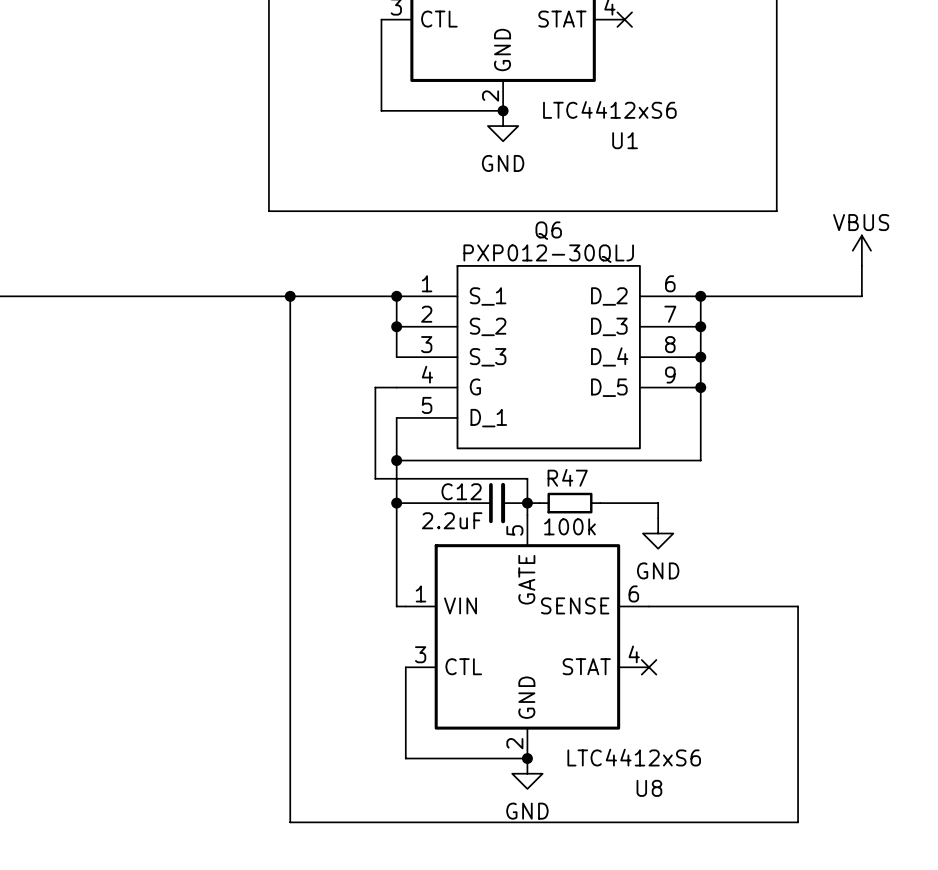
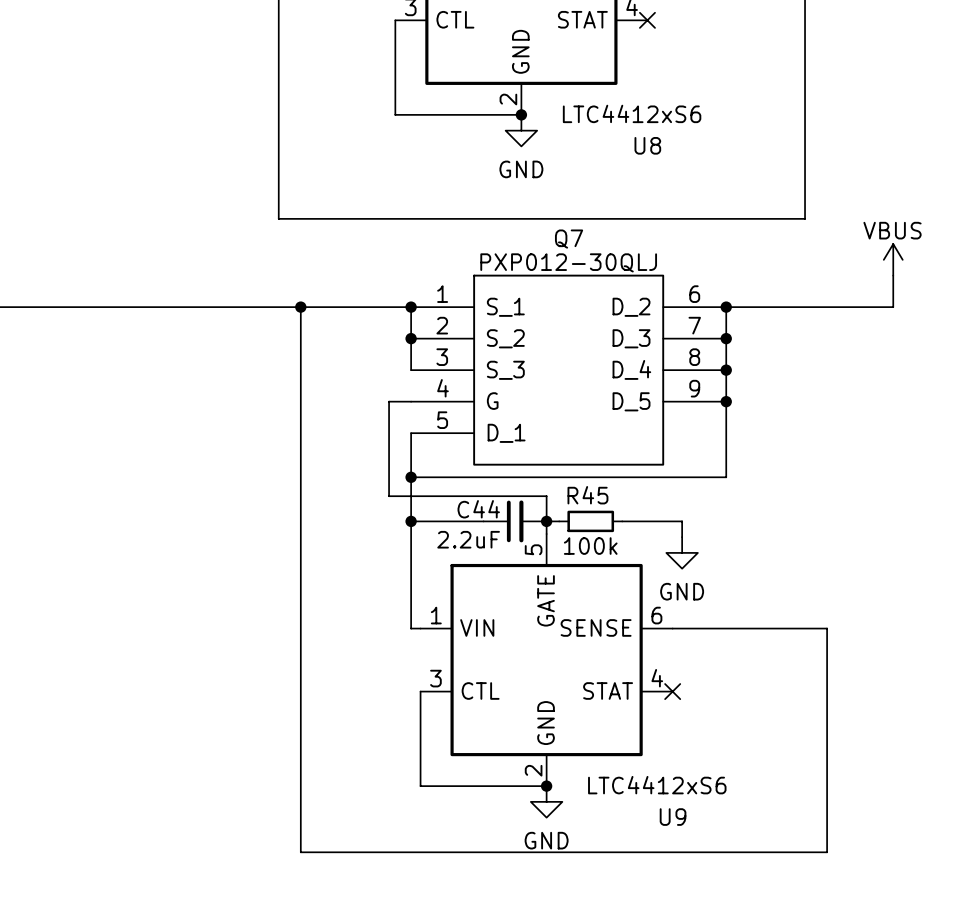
U1 name: U1 (625, 140) -> U8 (647, 145)
Q6 name: Q6 (548, 230) -> Q7 (569, 239)
R47 name: R47 (567, 477) -> R45 (587, 495)
C12 name: C12 (461, 491) -> C44 (478, 509)
U8 name: U8 (649, 788) -> U9 (673, 817)

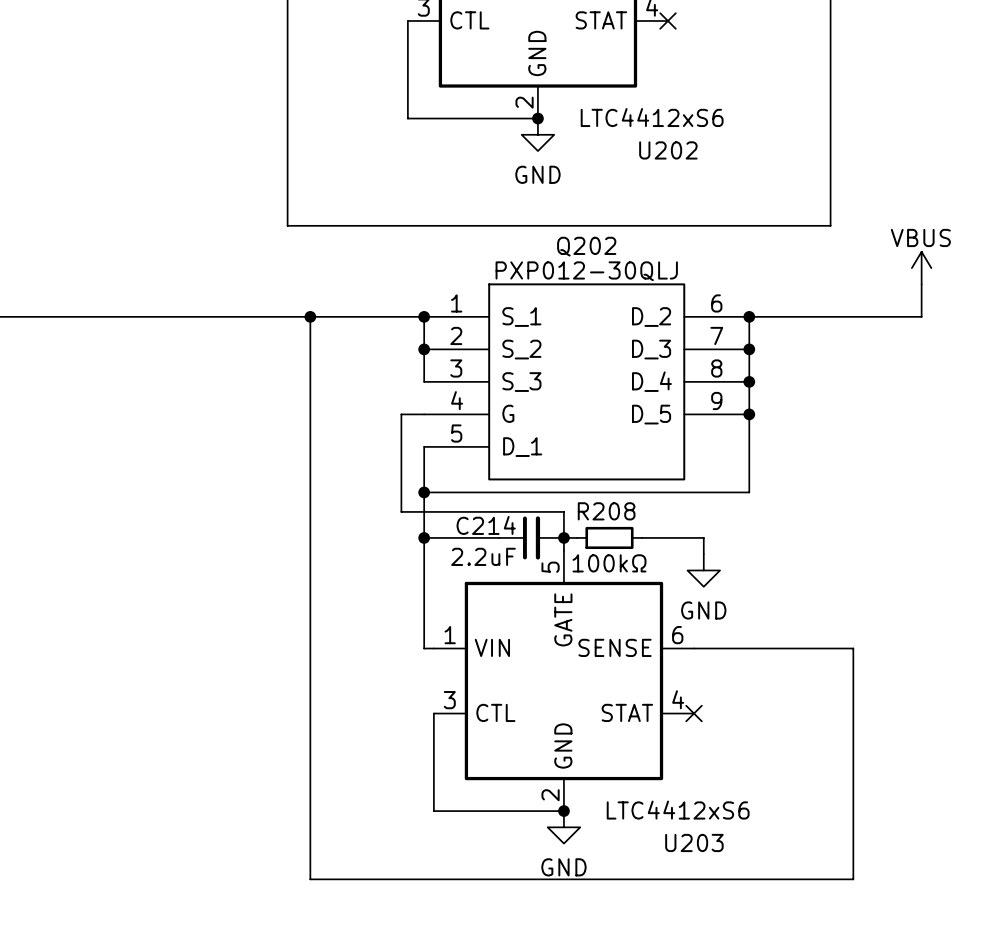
U8 name: U8 (647, 145) -> U202 (668, 150)
Q7 name: Q7 (569, 239) -> Q202 (586, 246)
R45 name: R45 (587, 495) -> R208 (606, 511)
C44 name: C44 (478, 509) -> C214 (486, 525)
R45 value: 100k (590, 546) -> 100kΩ (609, 563)
U9 name: U9 (673, 817) -> U203 (694, 842)

